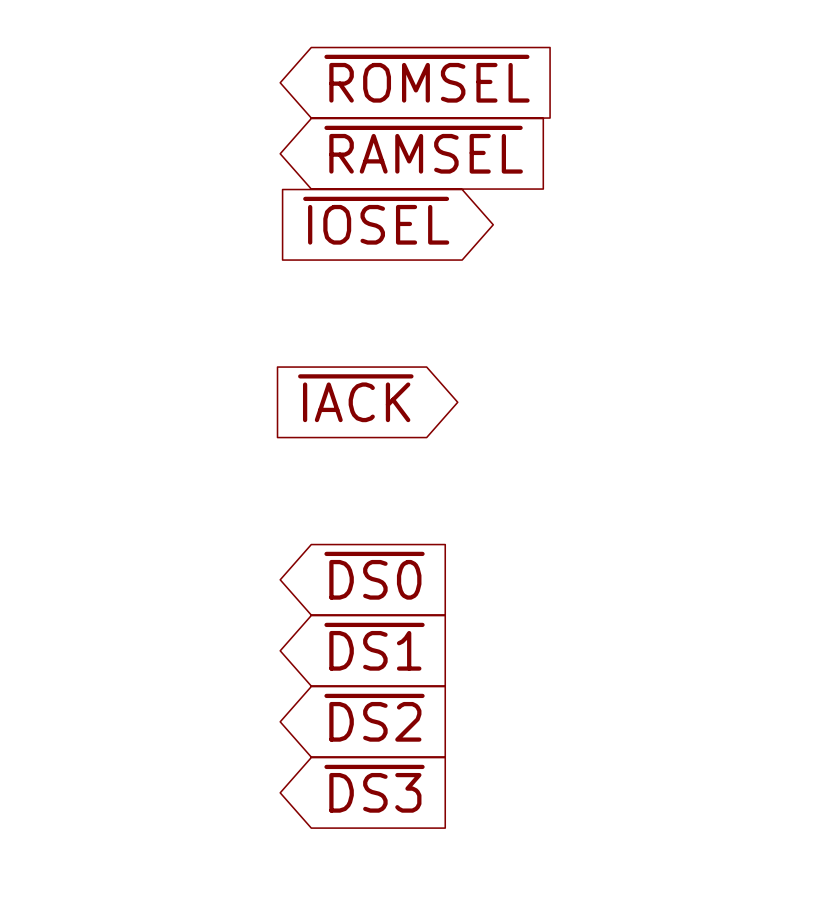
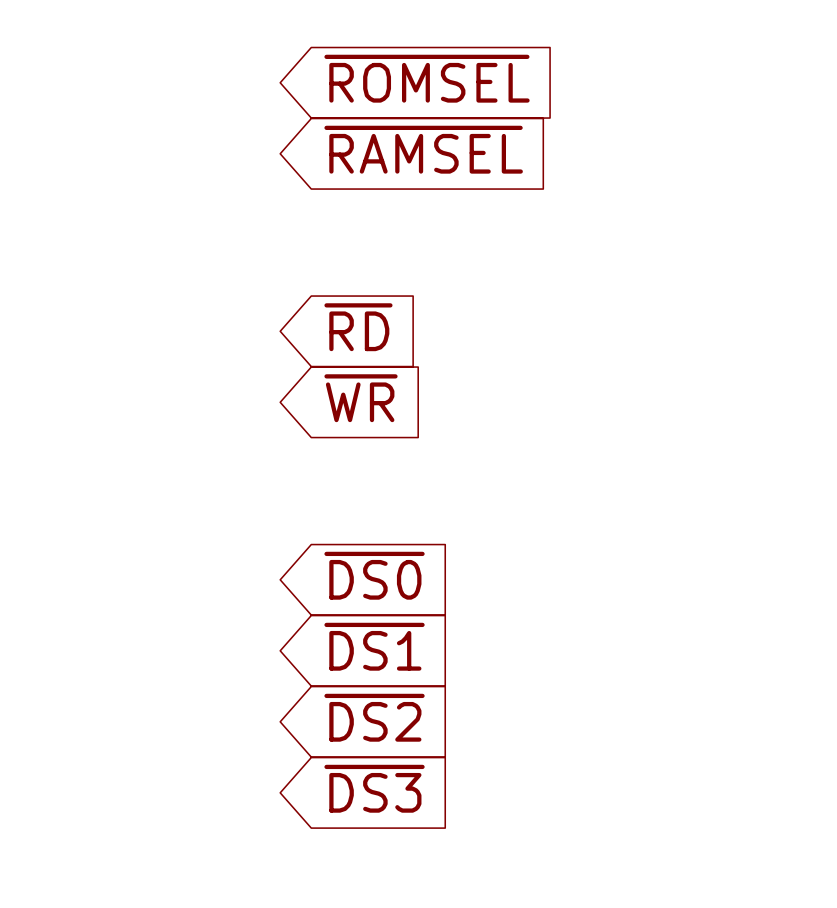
global label: ~{IOSEL} (376, 220) -> none
global label: none -> ~{RD} (358, 327)
global label: ~{IACK} (355, 398) -> none
global label: none -> ~{WR} (361, 398)

